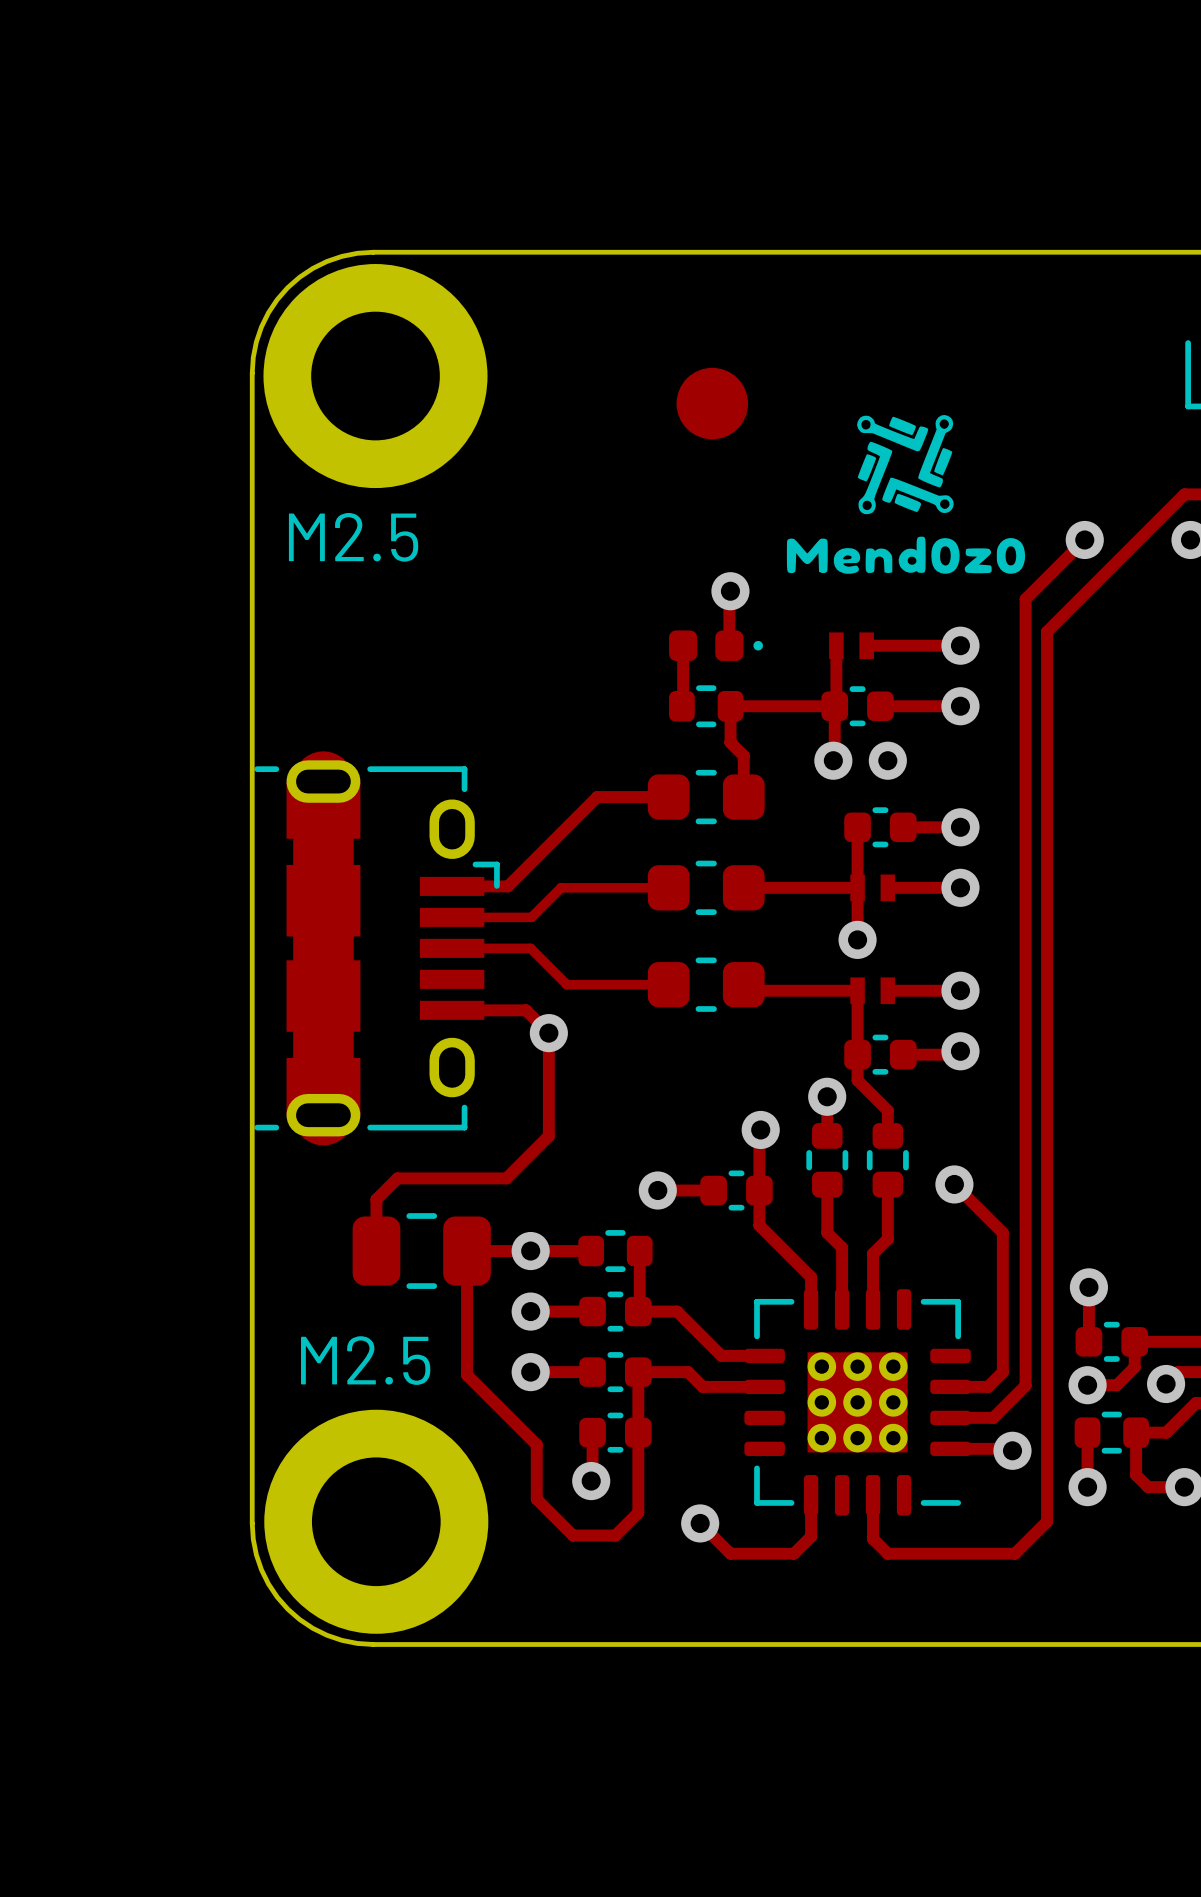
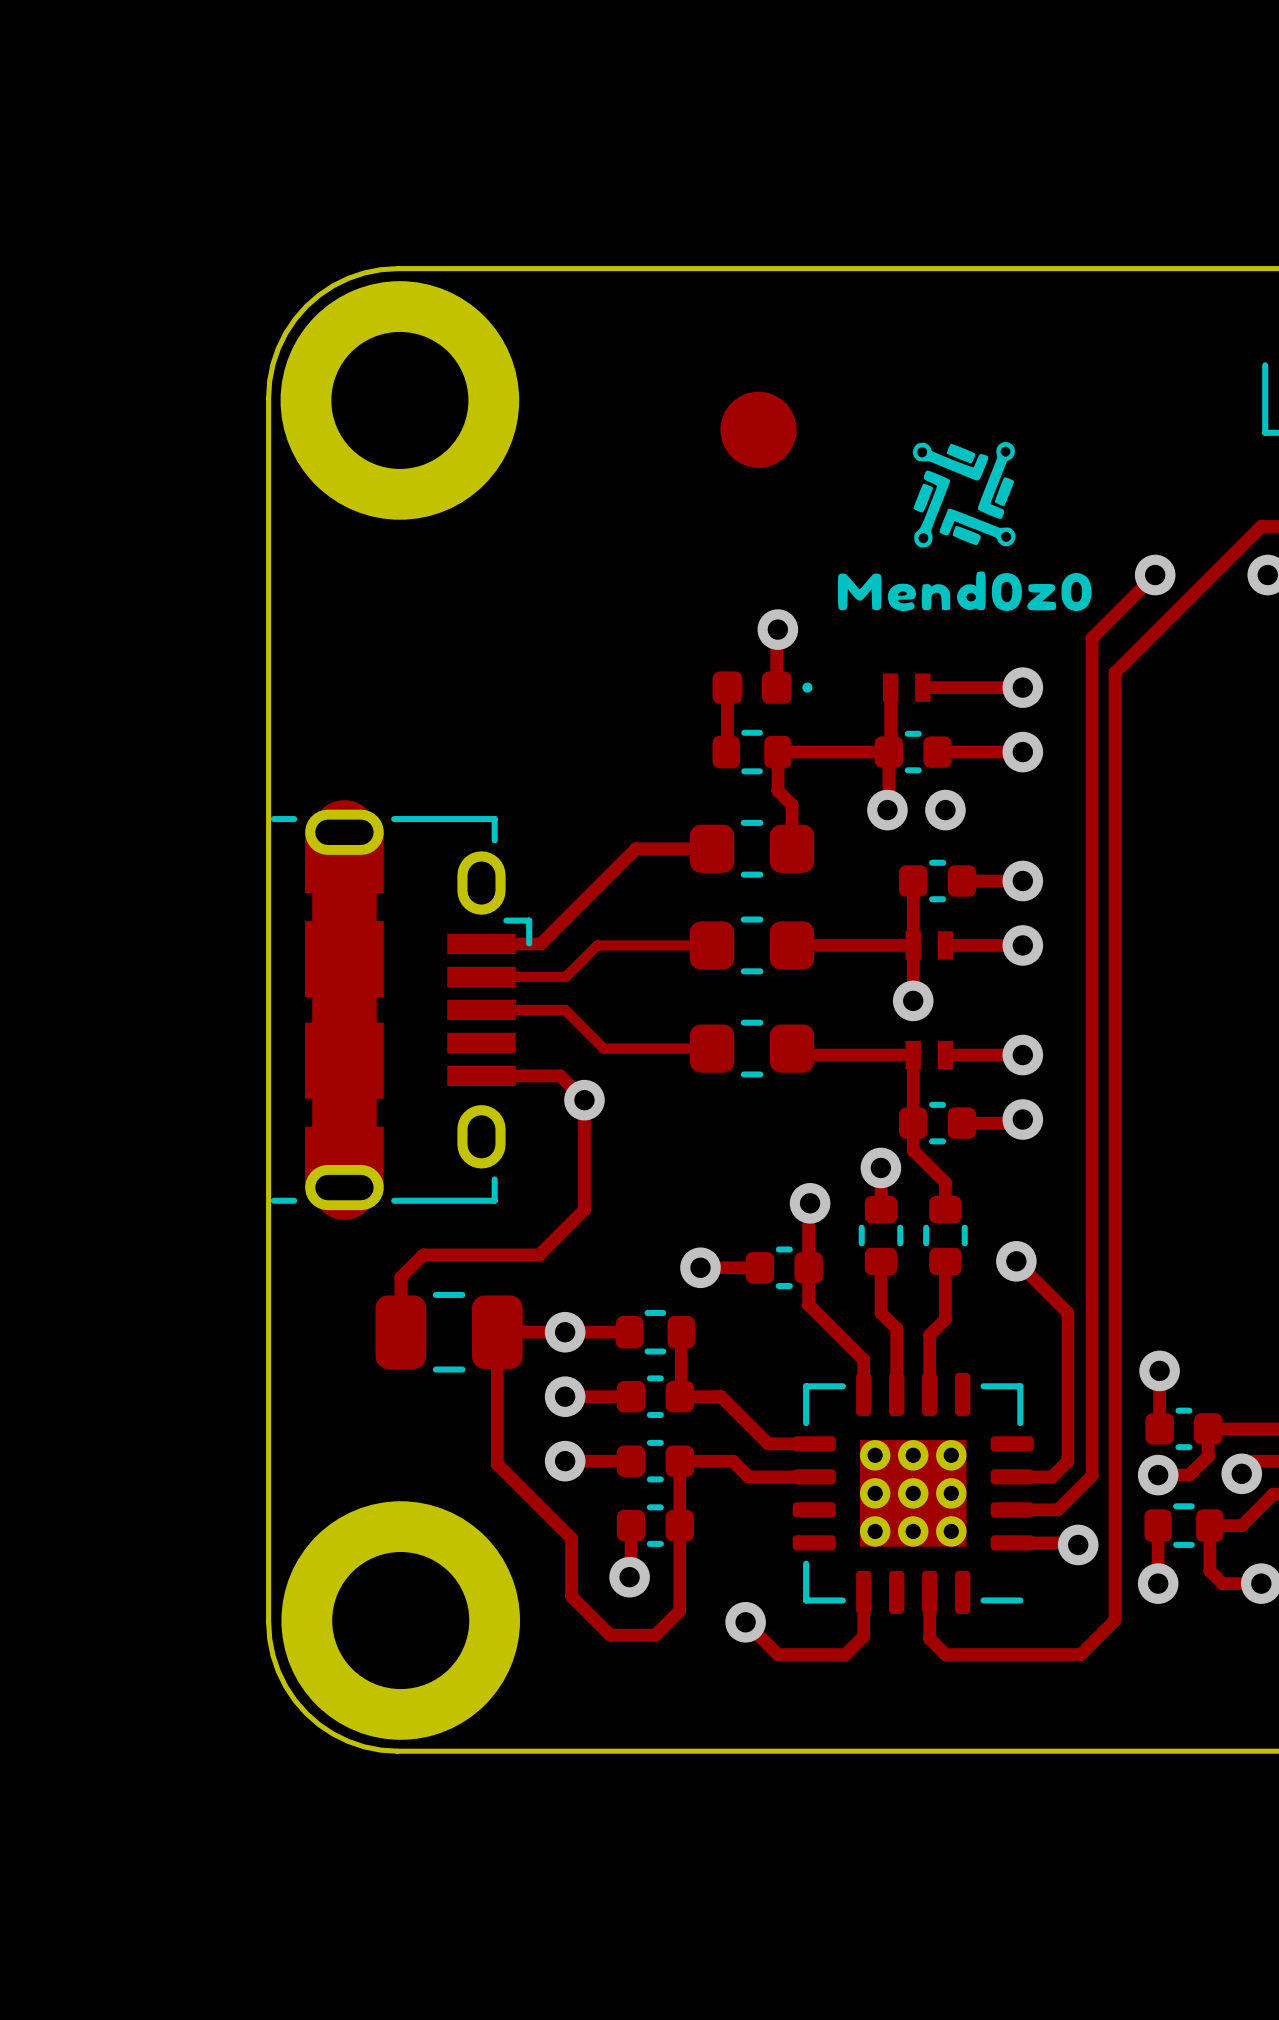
text: M2.5 (353, 537) -> none
text: M2.5 (365, 1360) -> none

